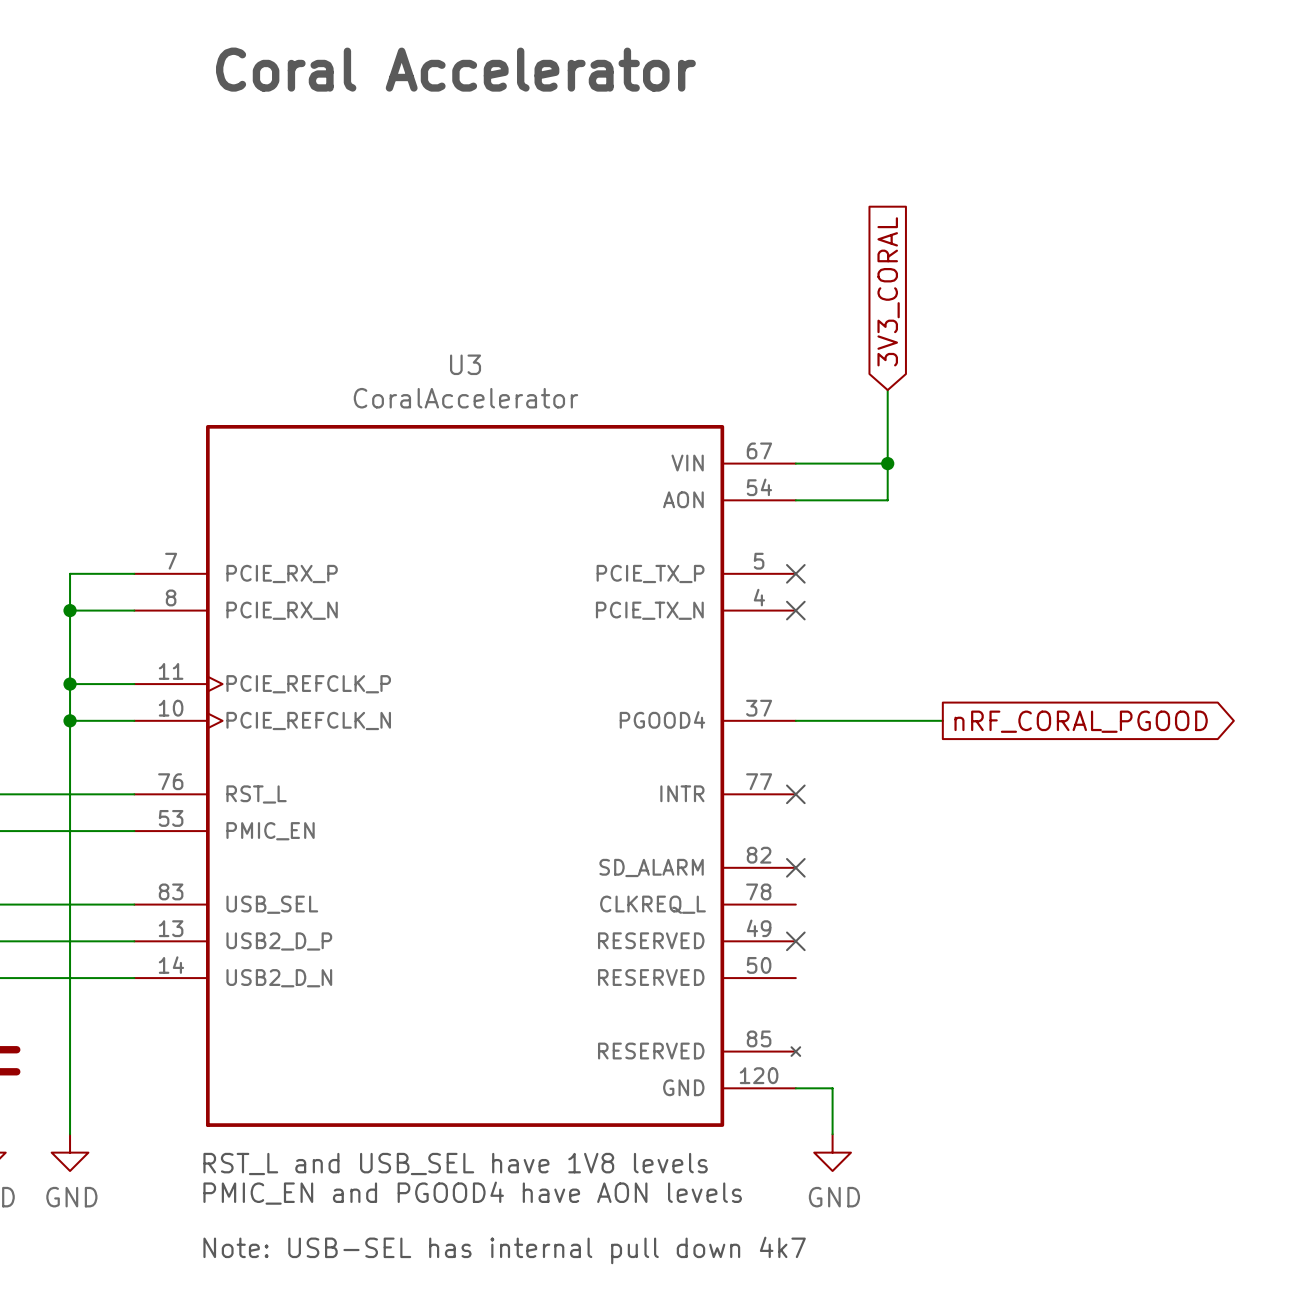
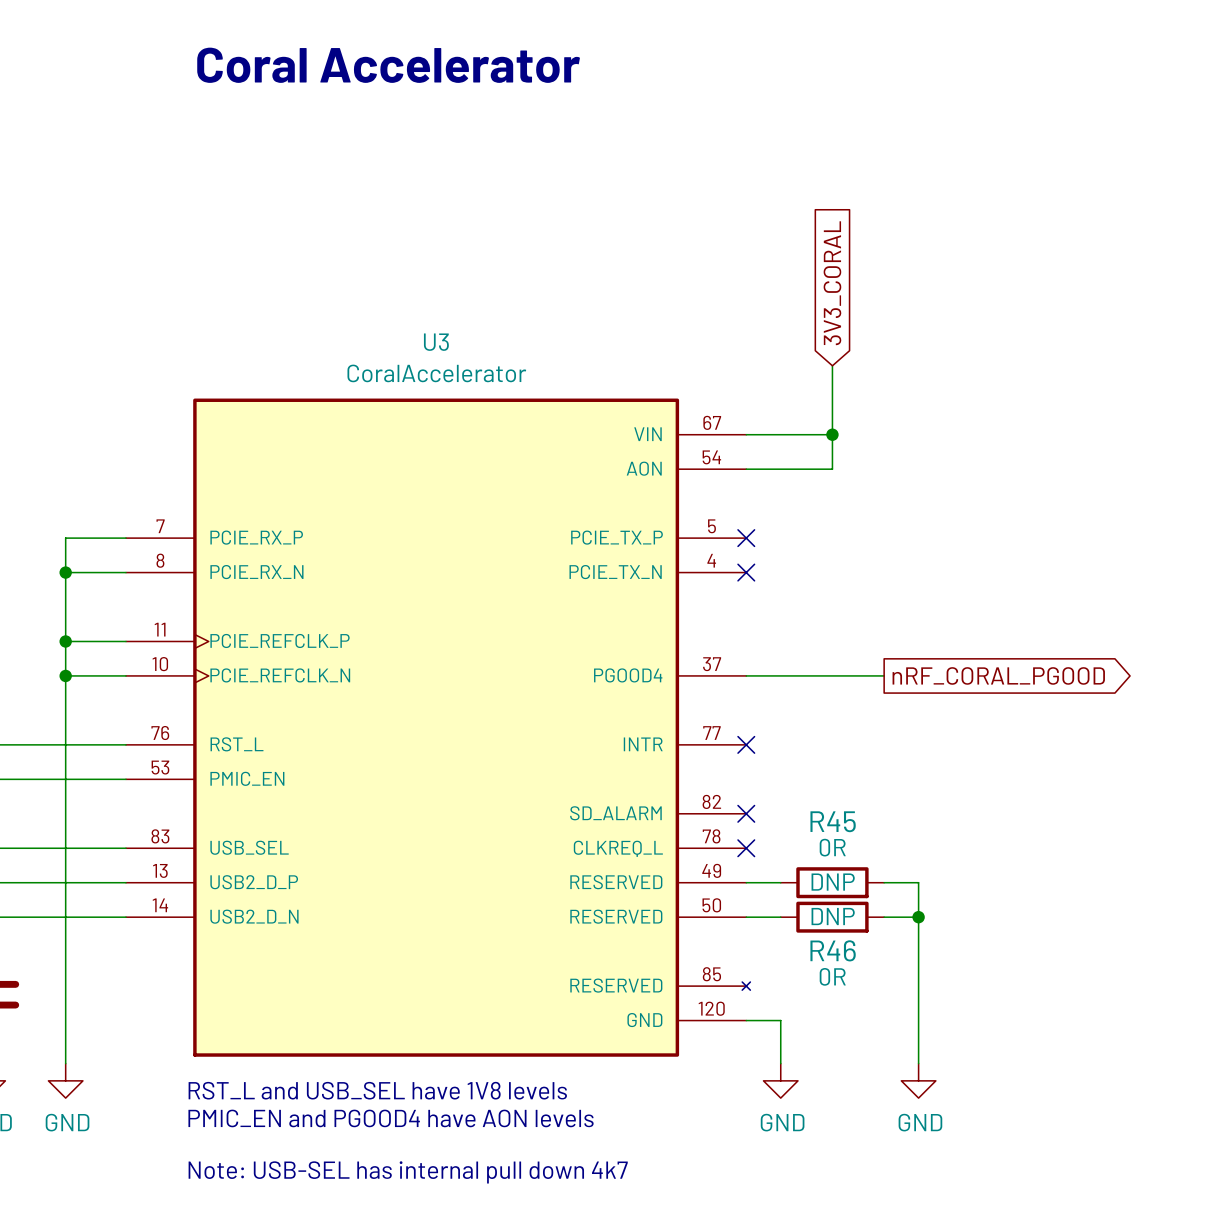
wire: none -> (746, 882) (780, 882)
no-connect mark position: (795, 941) -> (746, 848)
R45: none -> (832, 882)
wire: none -> (884, 882) (918, 882) (918, 1063)
wire: none -> (746, 917) (780, 917)
R46: none -> (832, 917)
wire: none -> (884, 917) (918, 917)
junction: none -> (918, 917)
power symbol: none -> GND (918, 1080)

